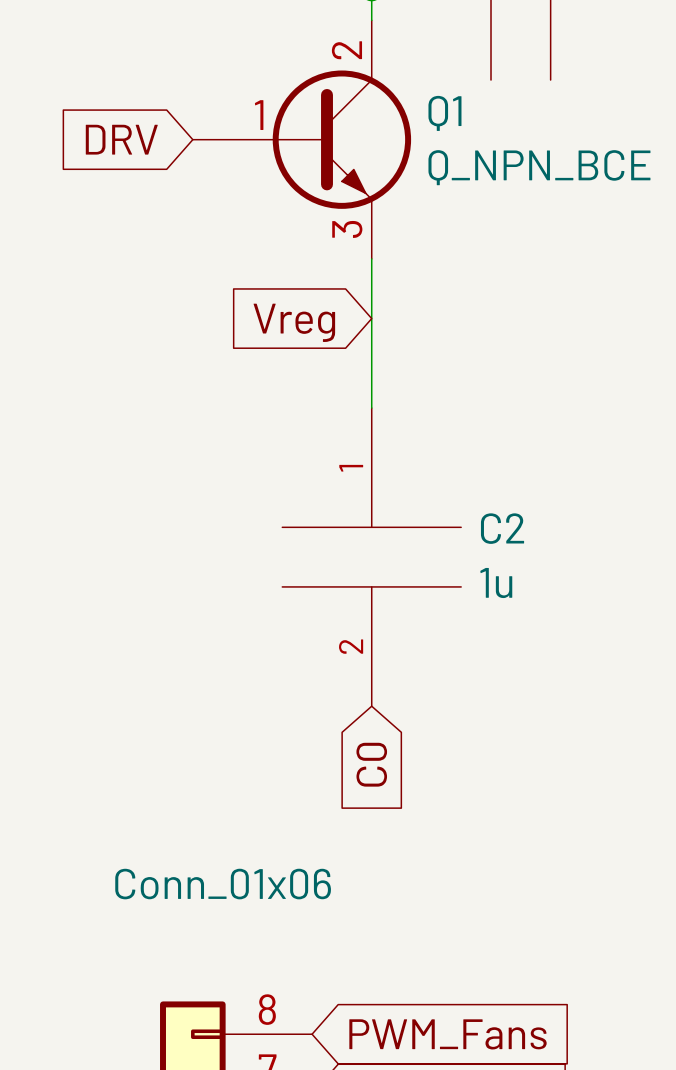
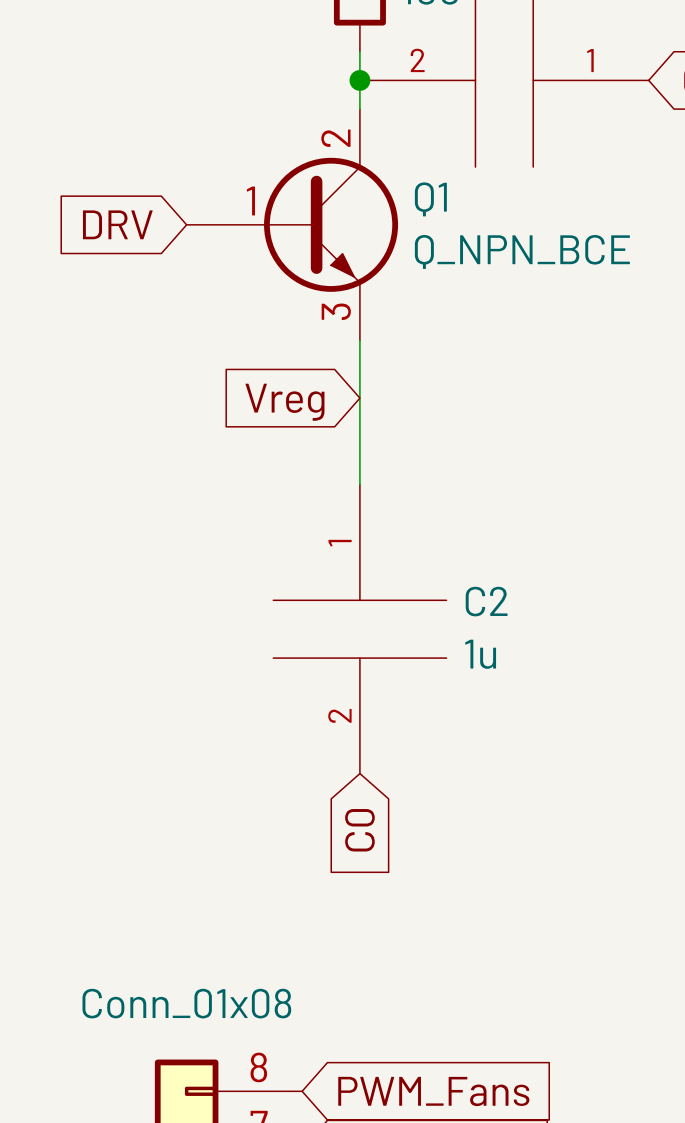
part value: Conn_01x06 (223, 884) -> Conn_01x08 (186, 1003)

